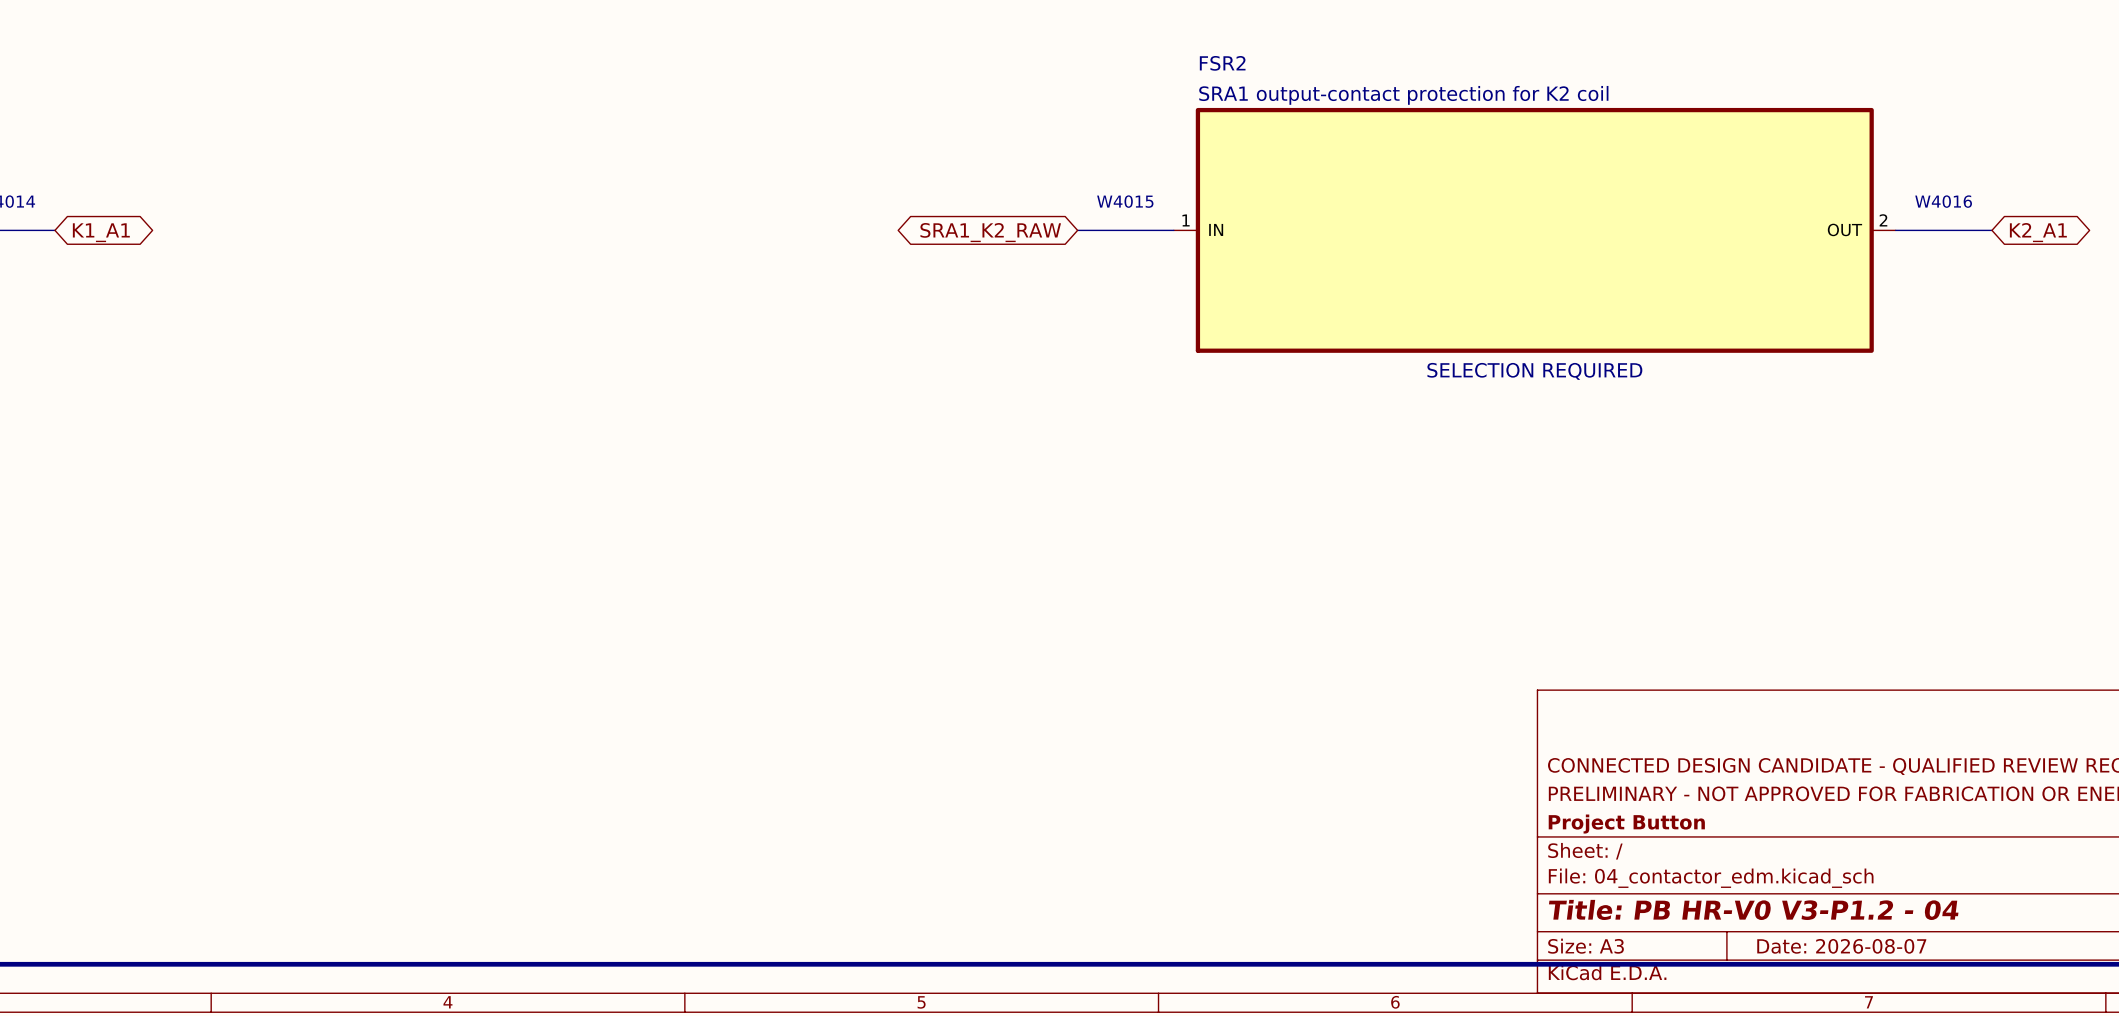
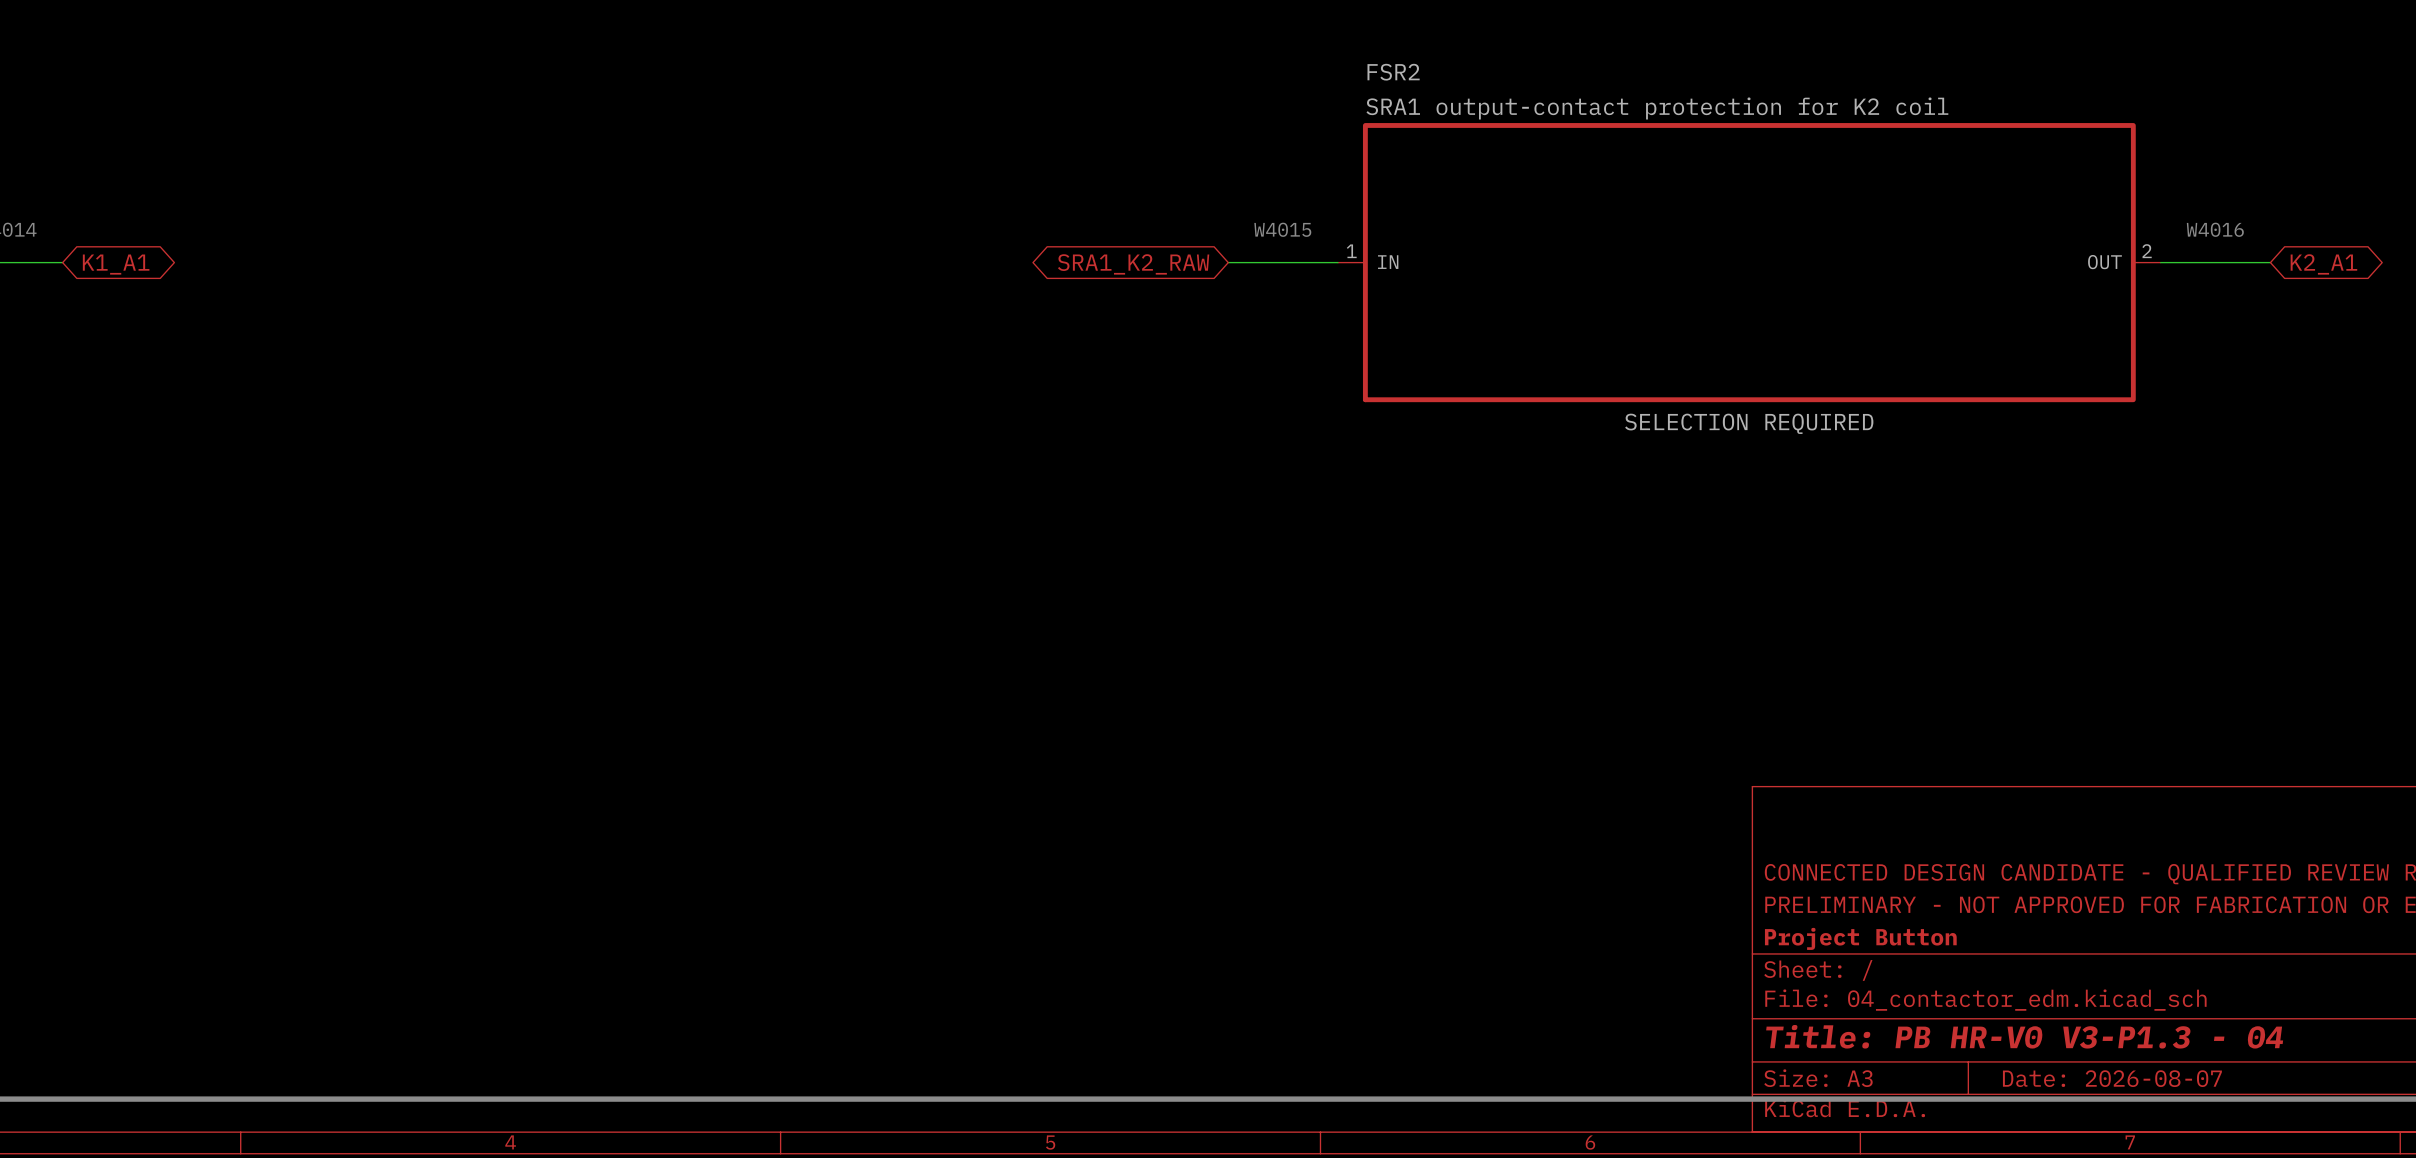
title block: Title: PB HR-V0 V3-P1.2 - 04 (1753, 909) -> Title: PB HR-V0 V3-P1.3 - 04 (2024, 1036)

